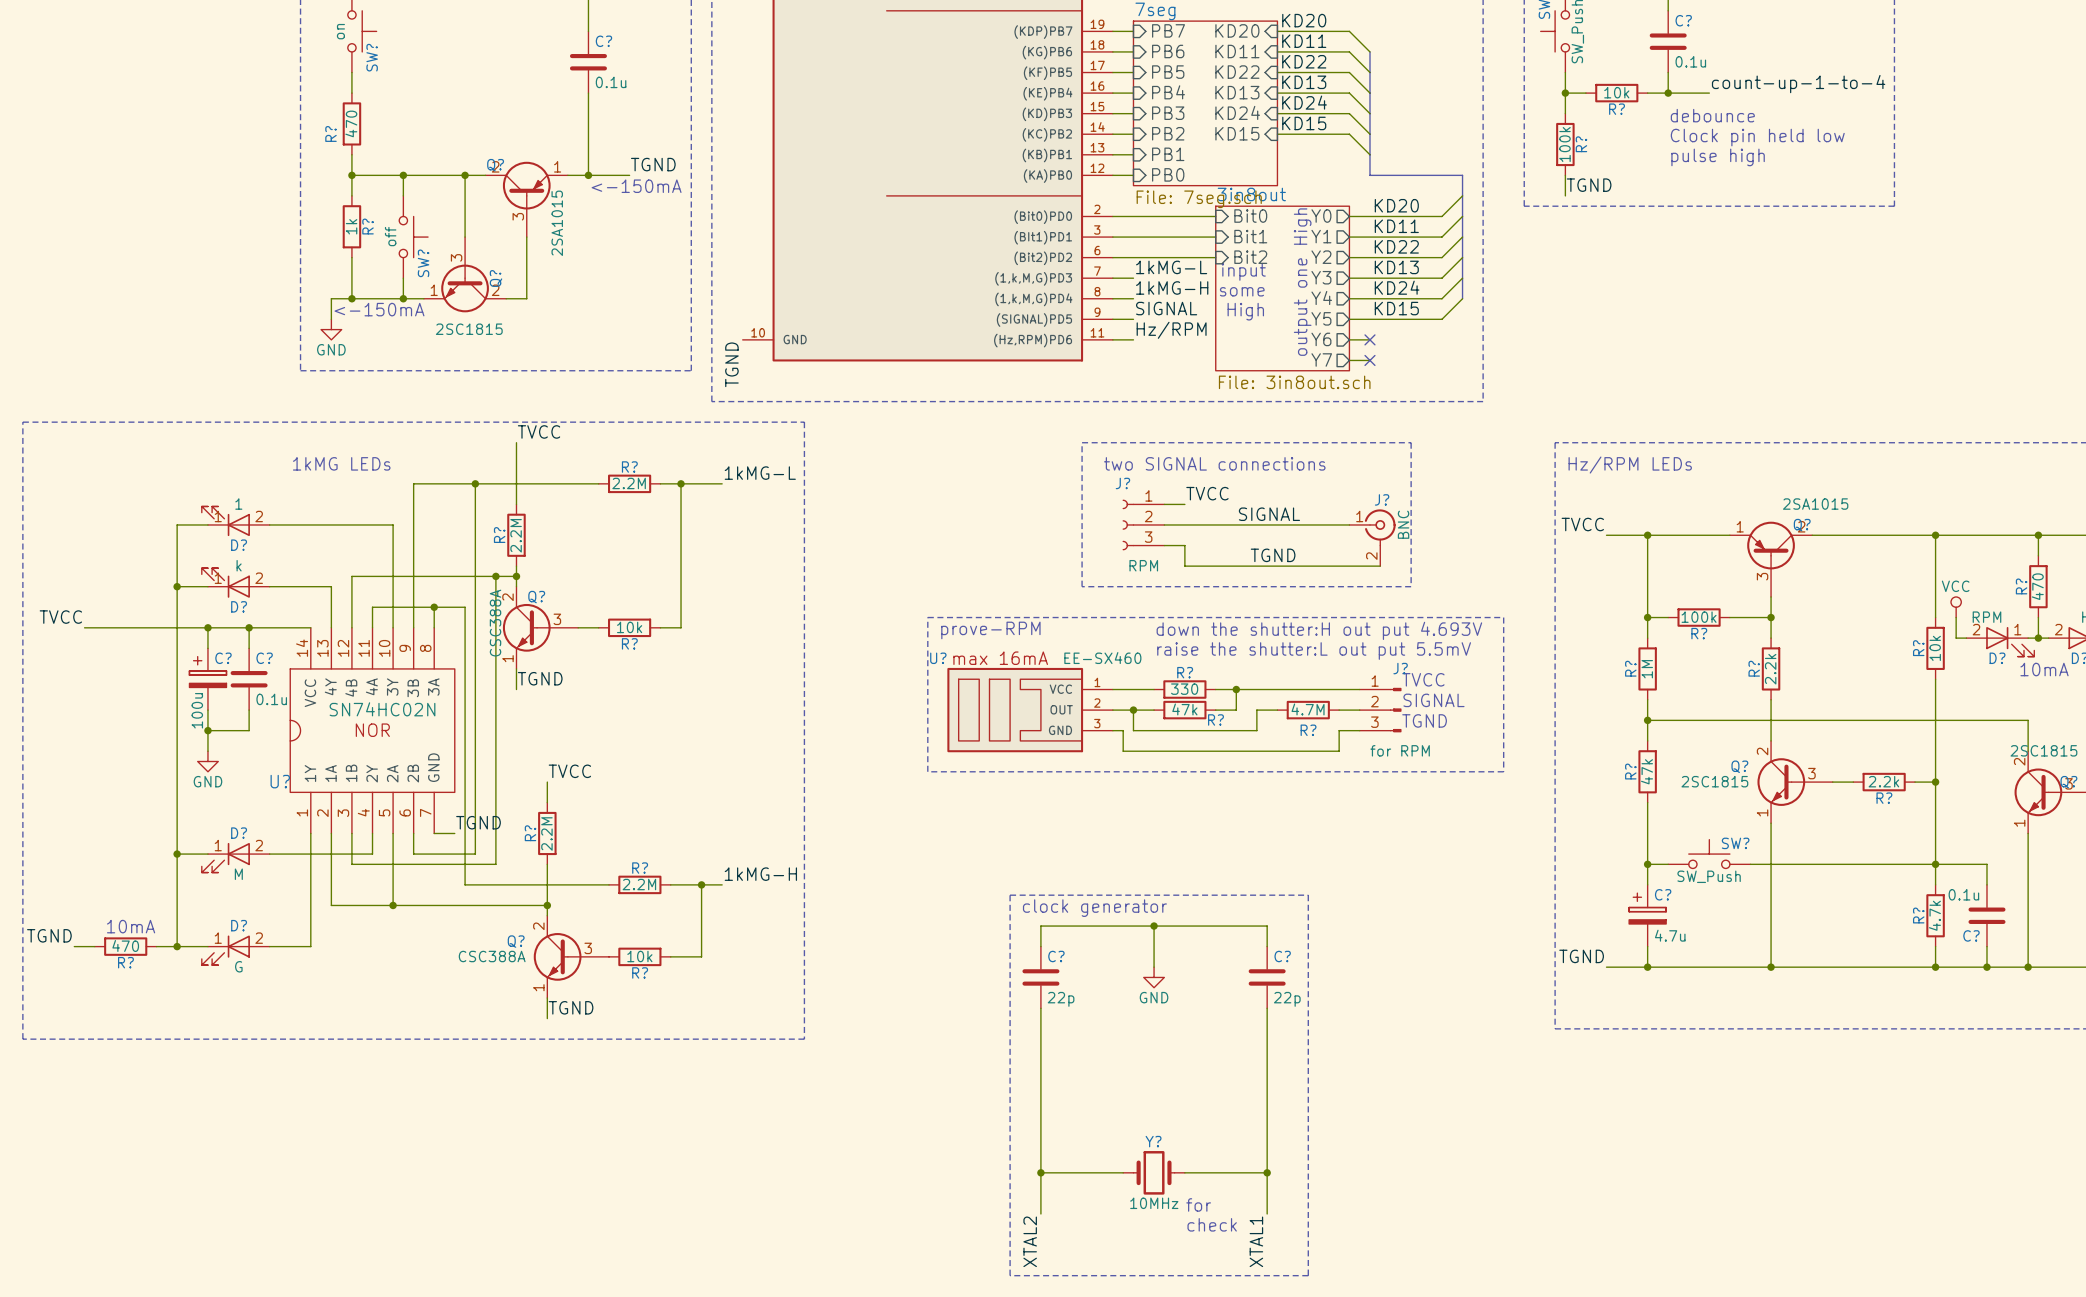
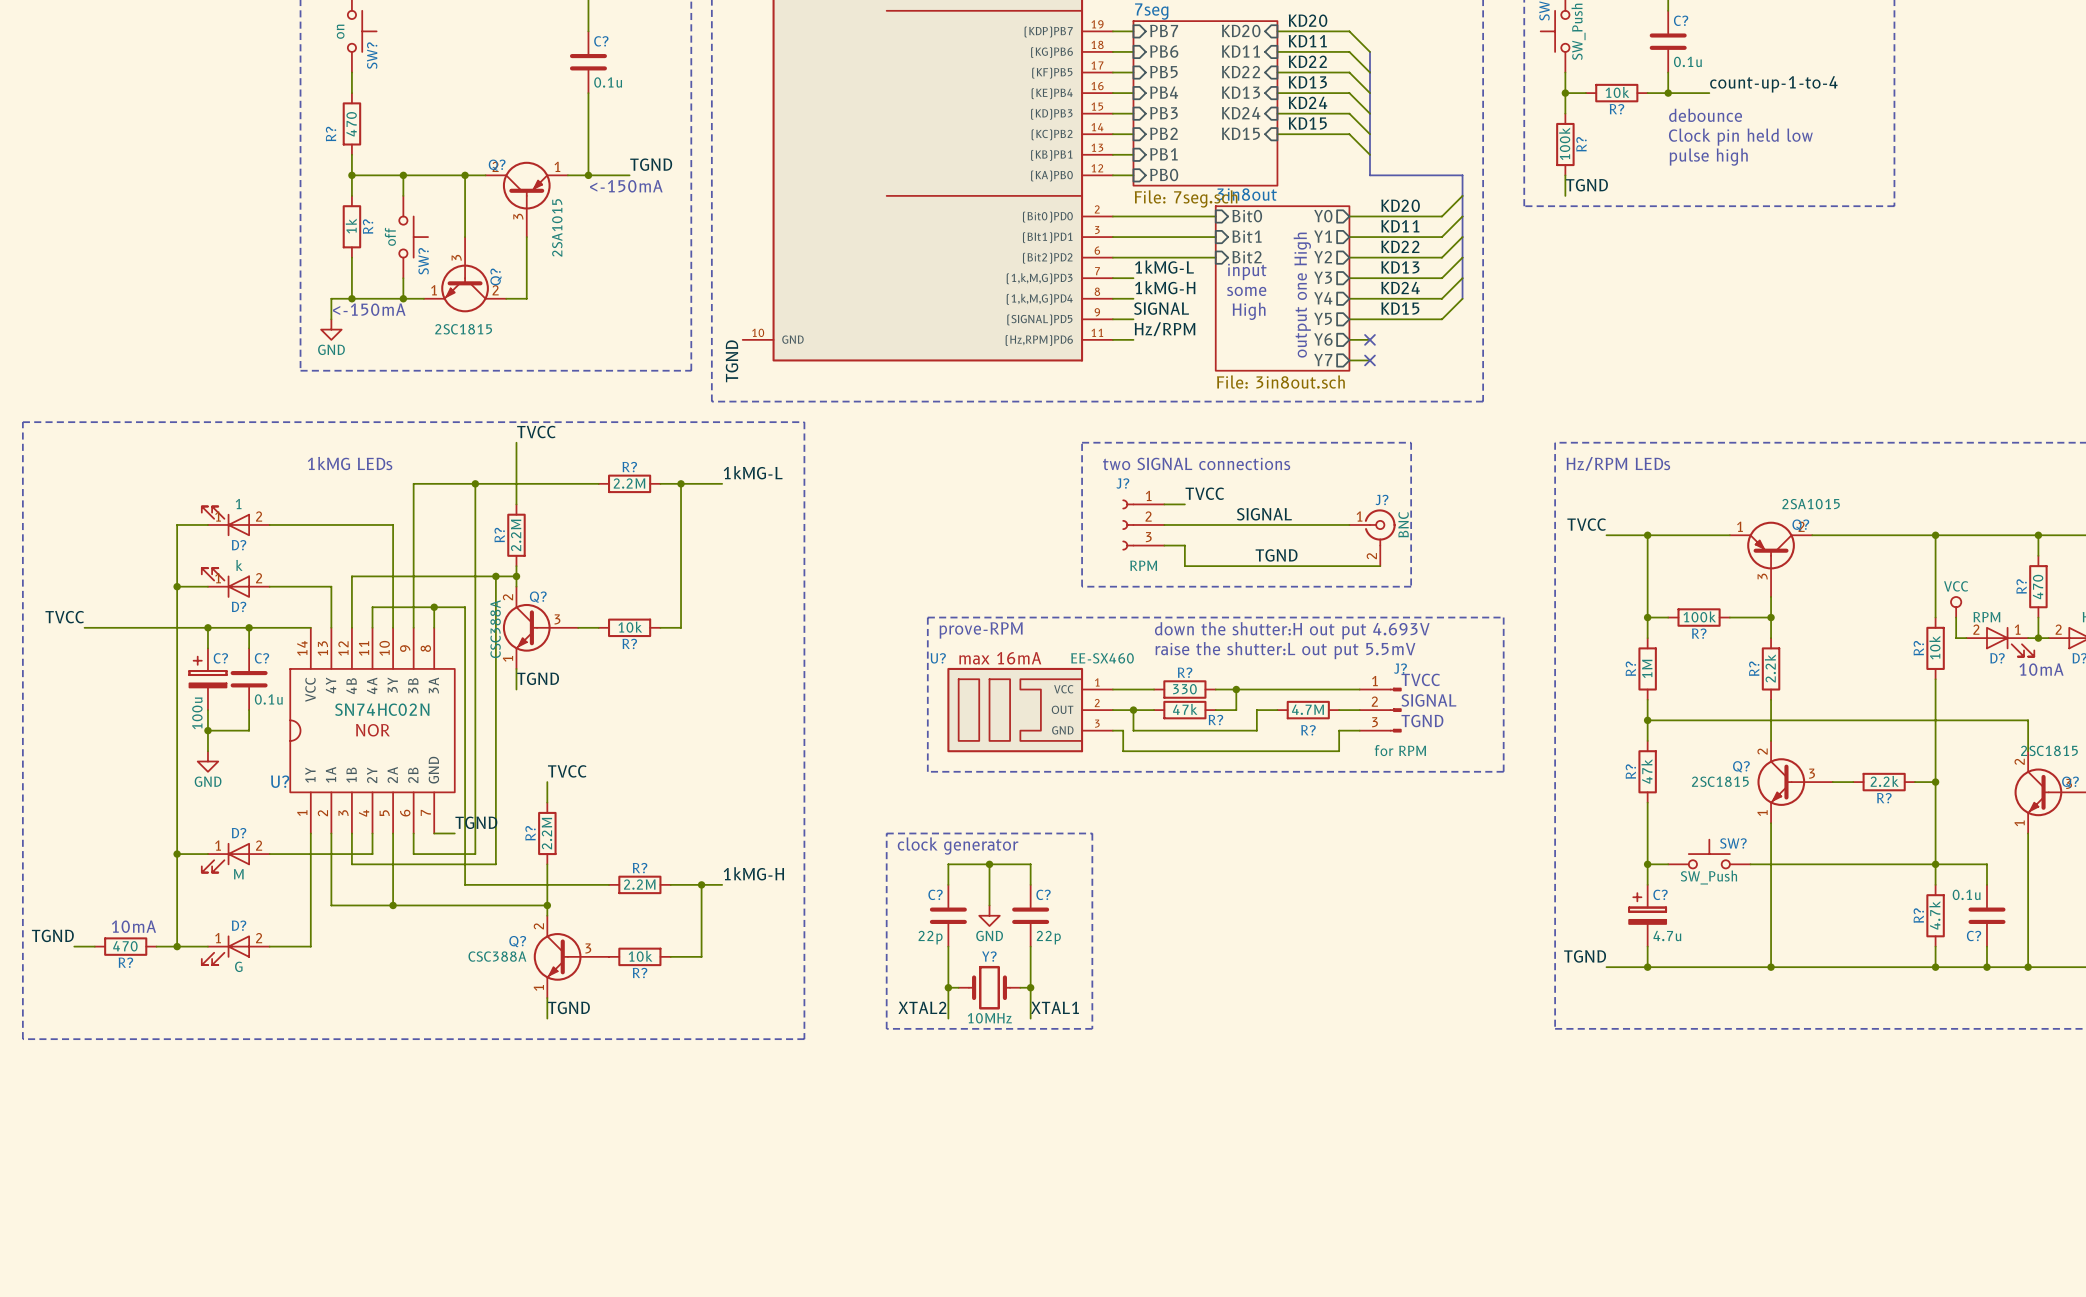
line: none -> (886, 833) (1092, 833) (1092, 1028) (886, 1028) (886, 833)
junction: none -> (989, 864)
wire: none -> (948, 884) (948, 864) (1030, 864) (1030, 884)
line: (1010, 895) (1308, 895) (1308, 1275) (1010, 1275) (1010, 895) -> none
text position: clock generator (1094, 908) -> clock generator (958, 846)
C?: none -> 22p (948, 915)
C?: none -> 22p (1030, 915)
wire: (1154, 926) (1154, 967) -> (989, 864) (989, 905)
junction: (1154, 926) -> none
wire: none -> (948, 946) (948, 1018)
wire: none -> (1030, 946) (1030, 1018)
wire: (1040, 946) (1040, 926) (1267, 926) (1267, 946) -> none
C?: 22p (1040, 977) -> none
power symbol position: GND (1154, 977) -> GND (989, 915)
C?: 22p (1267, 977) -> none
wire: none -> (948, 987) (958, 987)
junction: none -> (948, 987)
Y?: none -> 10MHz (989, 987)
wire: none -> (1020, 987) (1030, 987)
junction: none -> (1030, 987)
label: none -> XTAL2 (922, 1007)
label: none -> XTAL1 (1055, 1007)
wire: (1040, 1008) (1040, 1213) -> none
wire: (1267, 1008) (1267, 1213) -> none
wire: (1040, 1172) (1123, 1172) -> none
junction: (1040, 1172) -> none
Y?: 10MHz (1154, 1172) -> none
wire: (1184, 1172) (1267, 1172) -> none
junction: (1267, 1172) -> none
text: for (1198, 1204) -> none
text: check (1212, 1224) -> none
label: XTAL2 (1030, 1241) -> none
label: XTAL1 (1256, 1241) -> none

